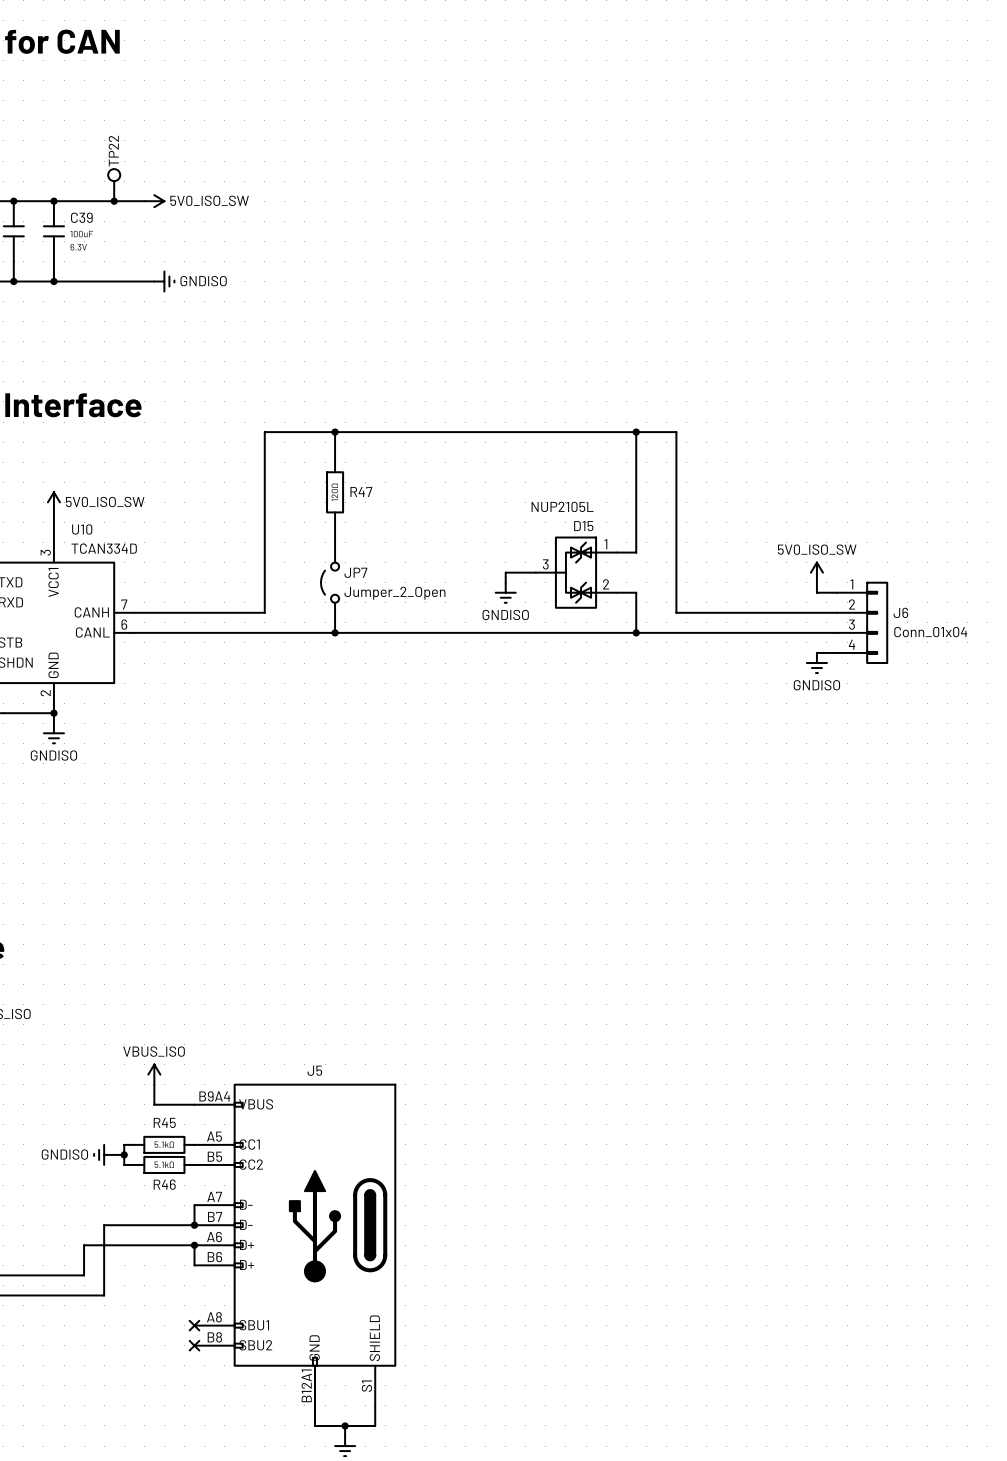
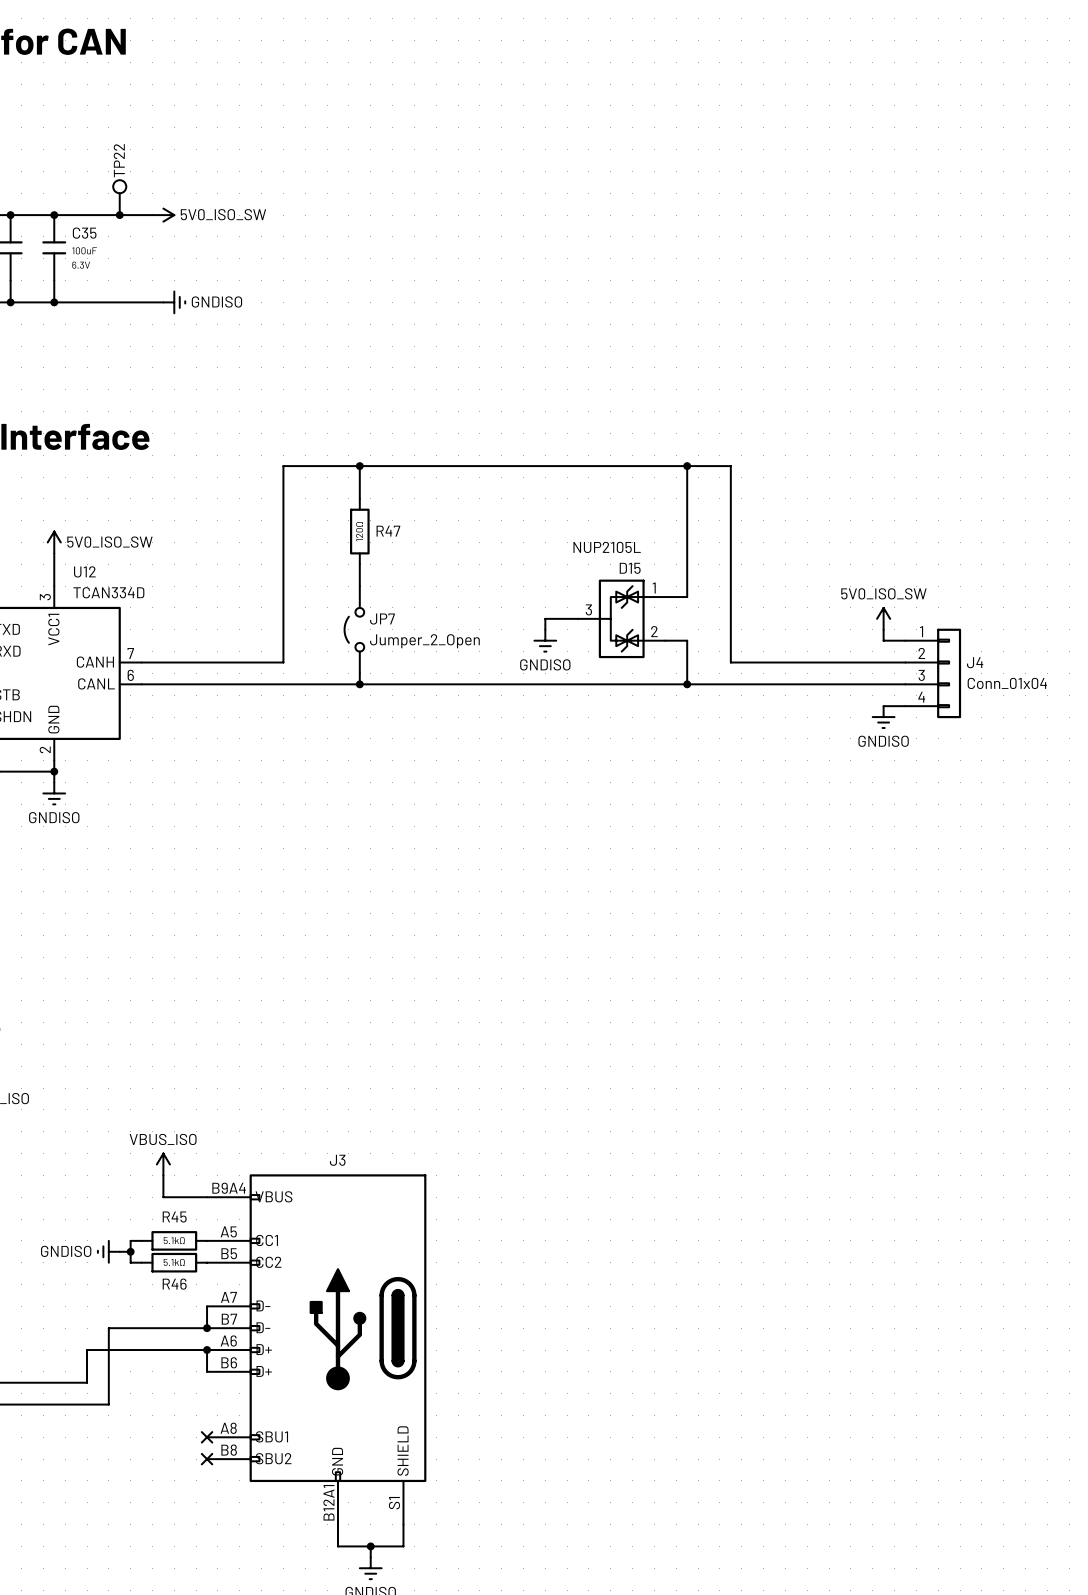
C39 name: C39 (81, 217) -> C35 (84, 233)
U10 name: U10 (82, 529) -> U12 (84, 571)
J6 name: J6 (900, 612) -> J4 (975, 662)
J5 name: J5 (314, 1070) -> J3 (337, 1160)

